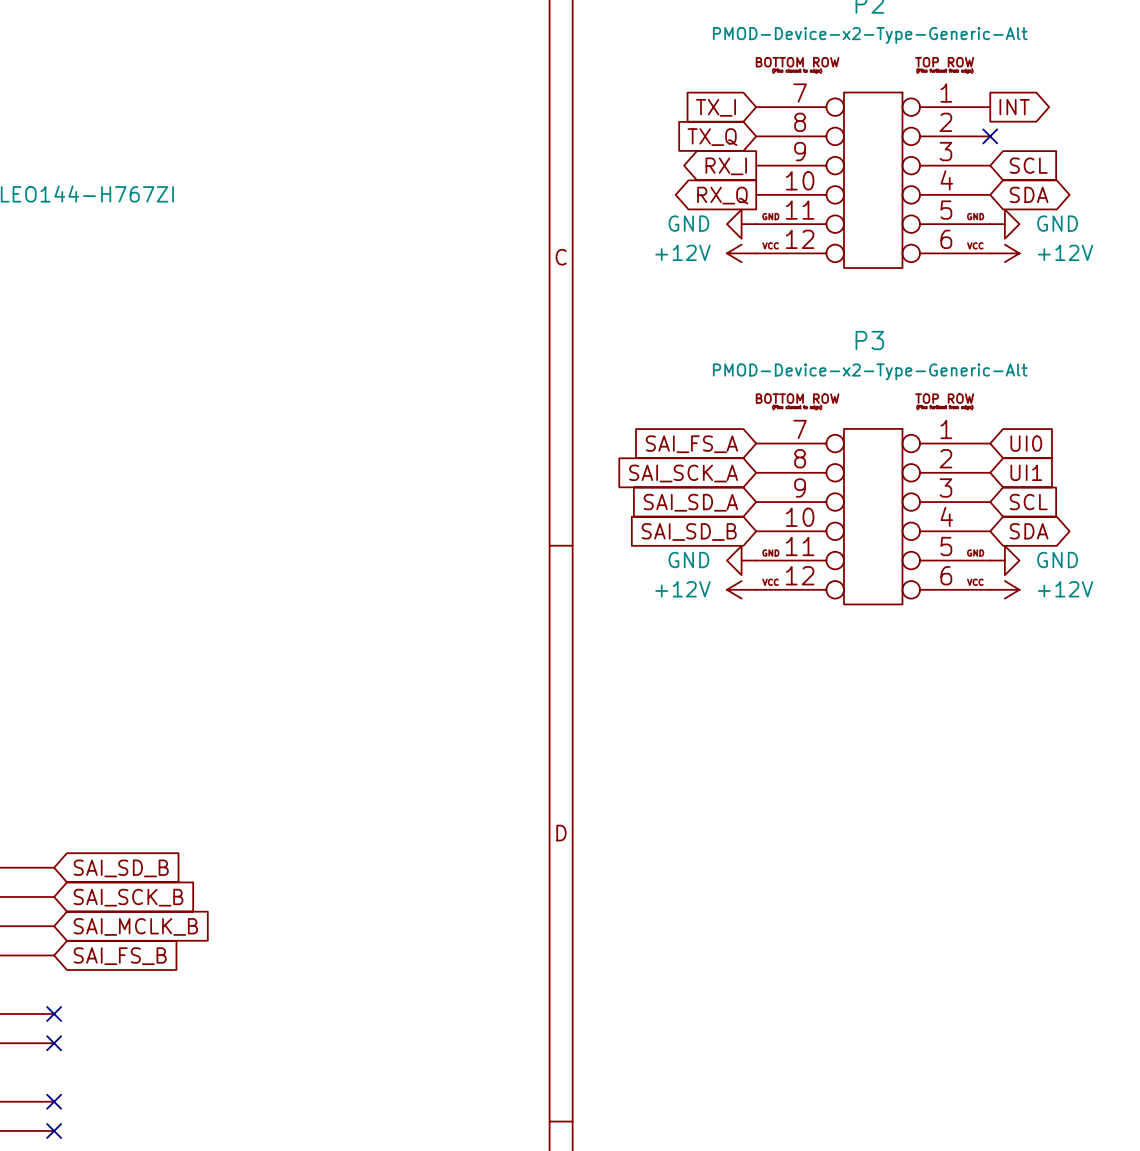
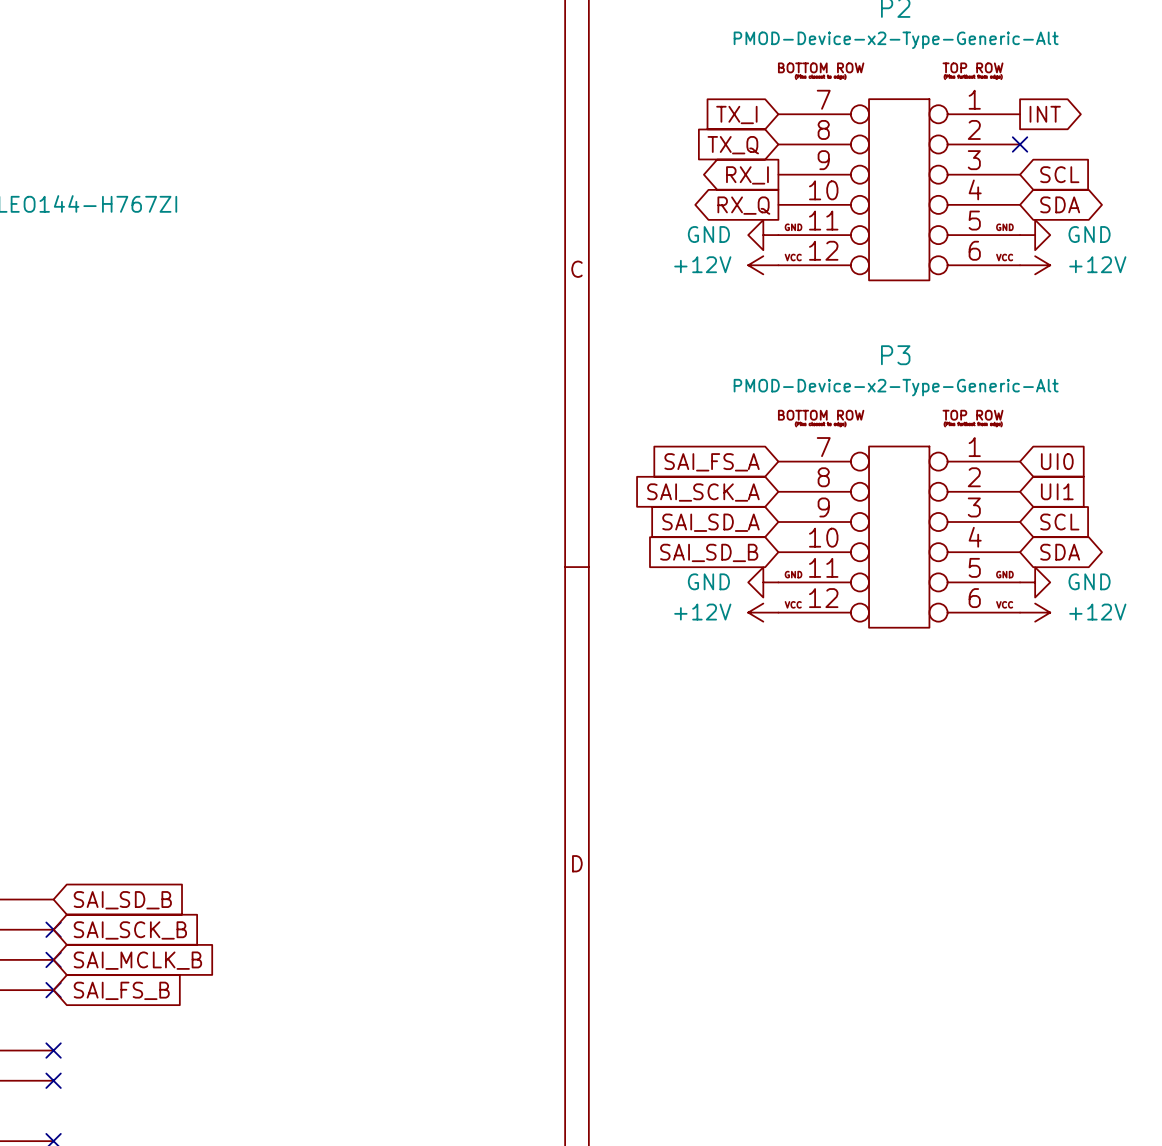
no-connect mark: none -> (53, 929)
no-connect mark: none -> (53, 959)
no-connect mark: none -> (53, 990)

